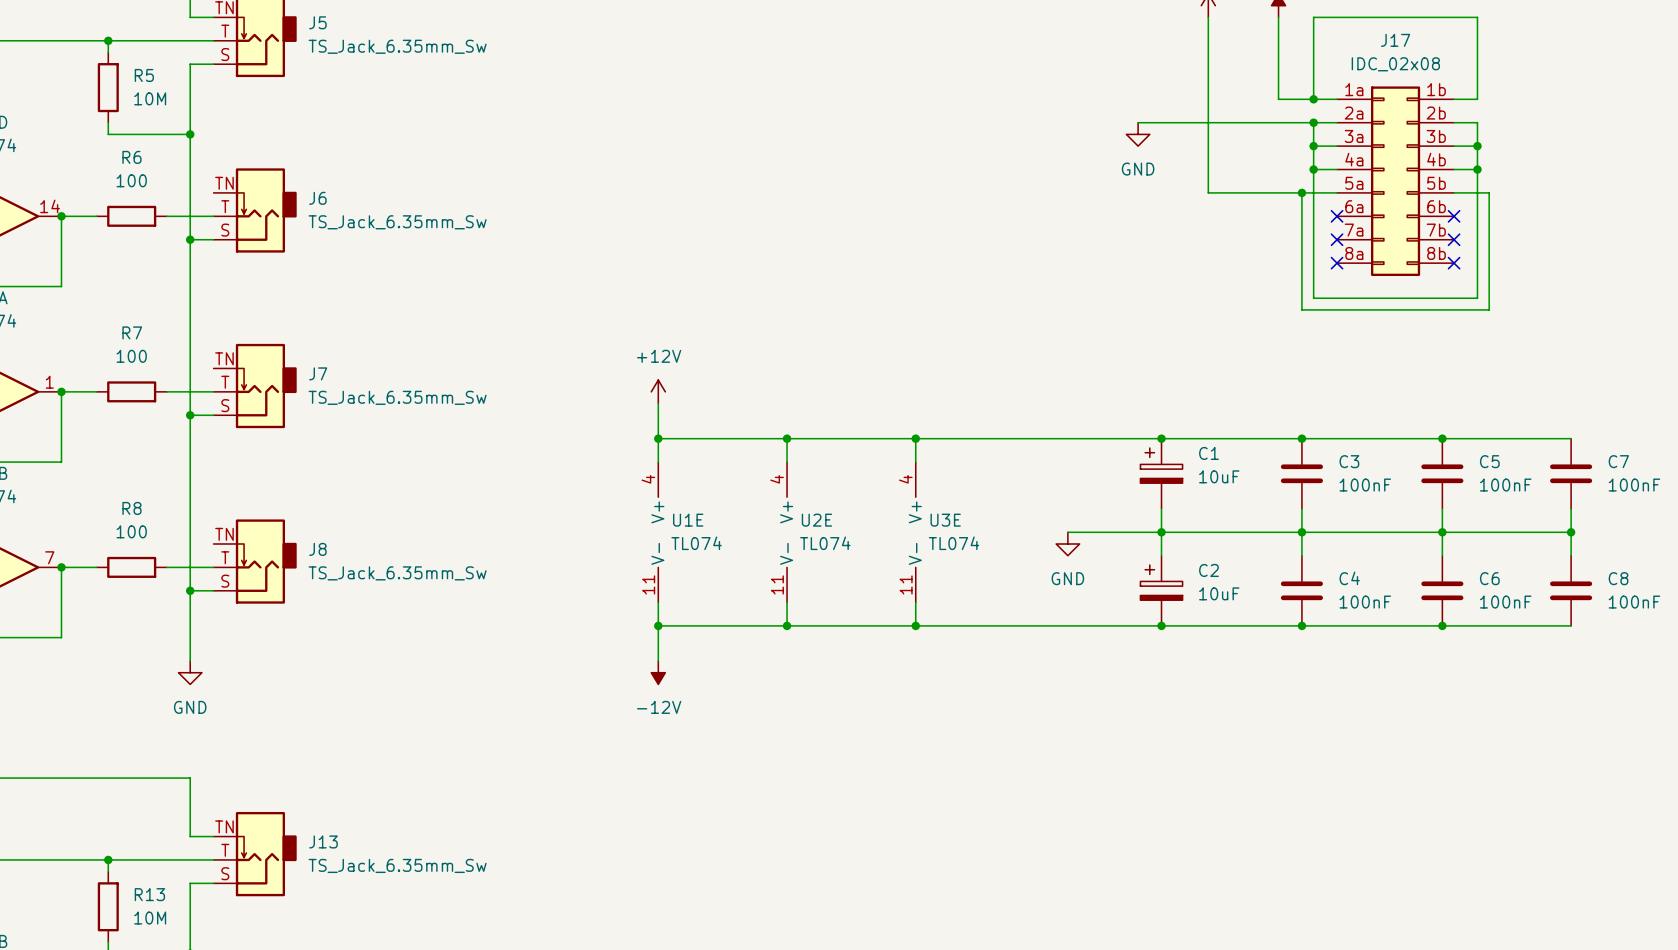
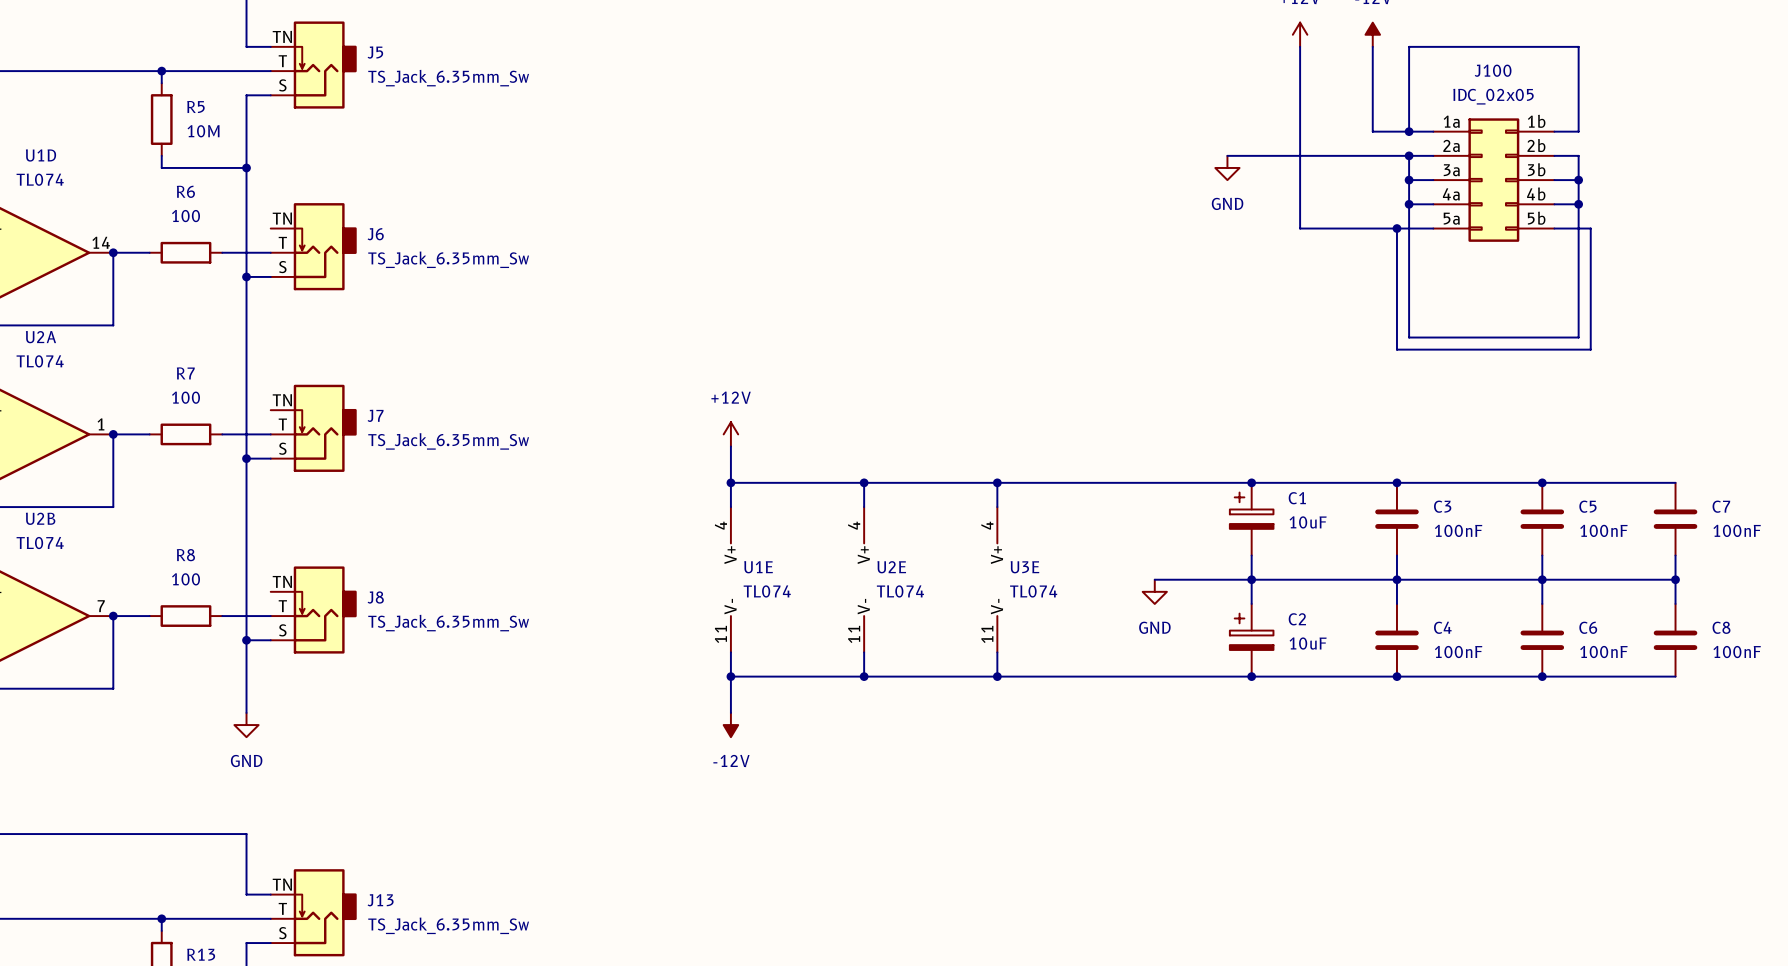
J100: none -> IDC_02x05 (1493, 180)
J17: IDC_02x08 (1395, 181) -> none
no-connect mark: (1337, 216) -> none
no-connect mark: (1454, 216) -> none
no-connect mark: (1337, 239) -> none
no-connect mark: (1454, 239) -> none
no-connect mark: (1337, 263) -> none
no-connect mark: (1454, 263) -> none

